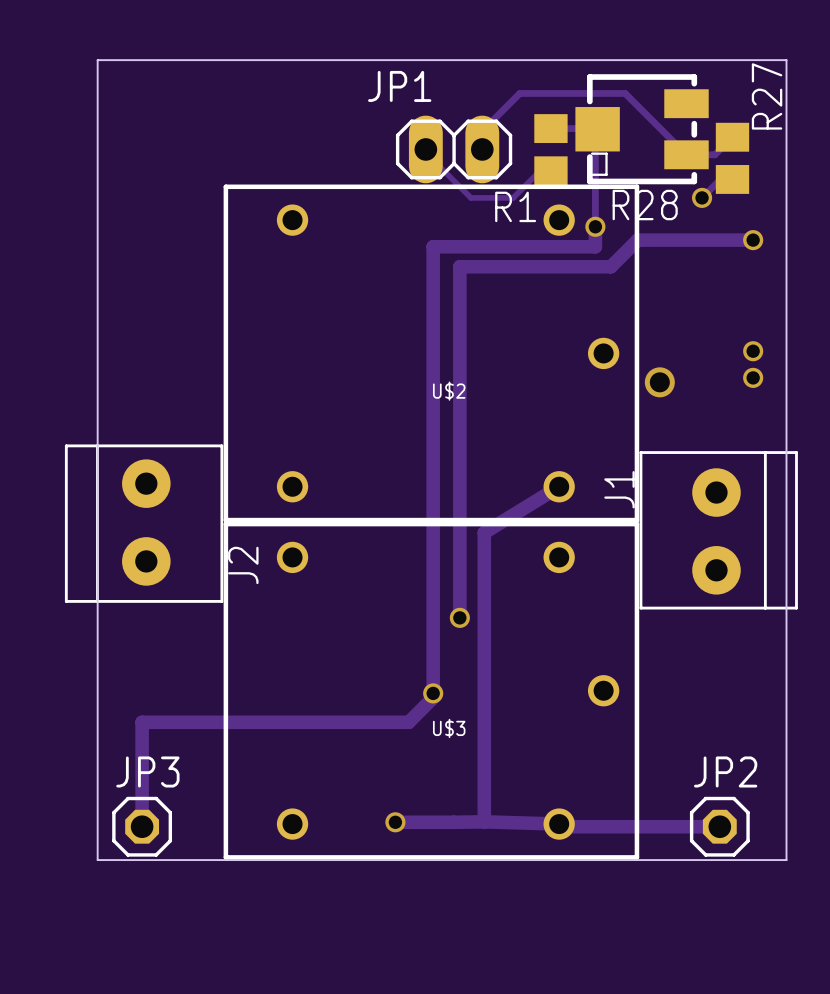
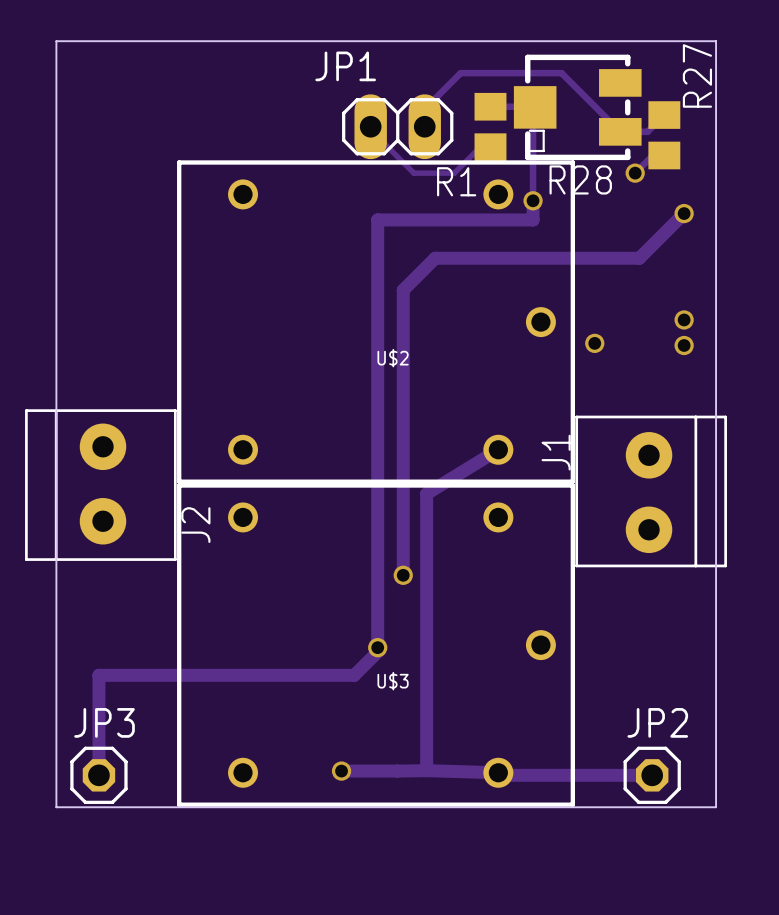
track: (753, 240) (637, 240) (610, 266) (459, 266) (459, 320) -> (684, 213) (639, 258) (435, 258) (403, 290)
via size: [644, 367, 675, 398] -> [585, 333, 605, 353]

